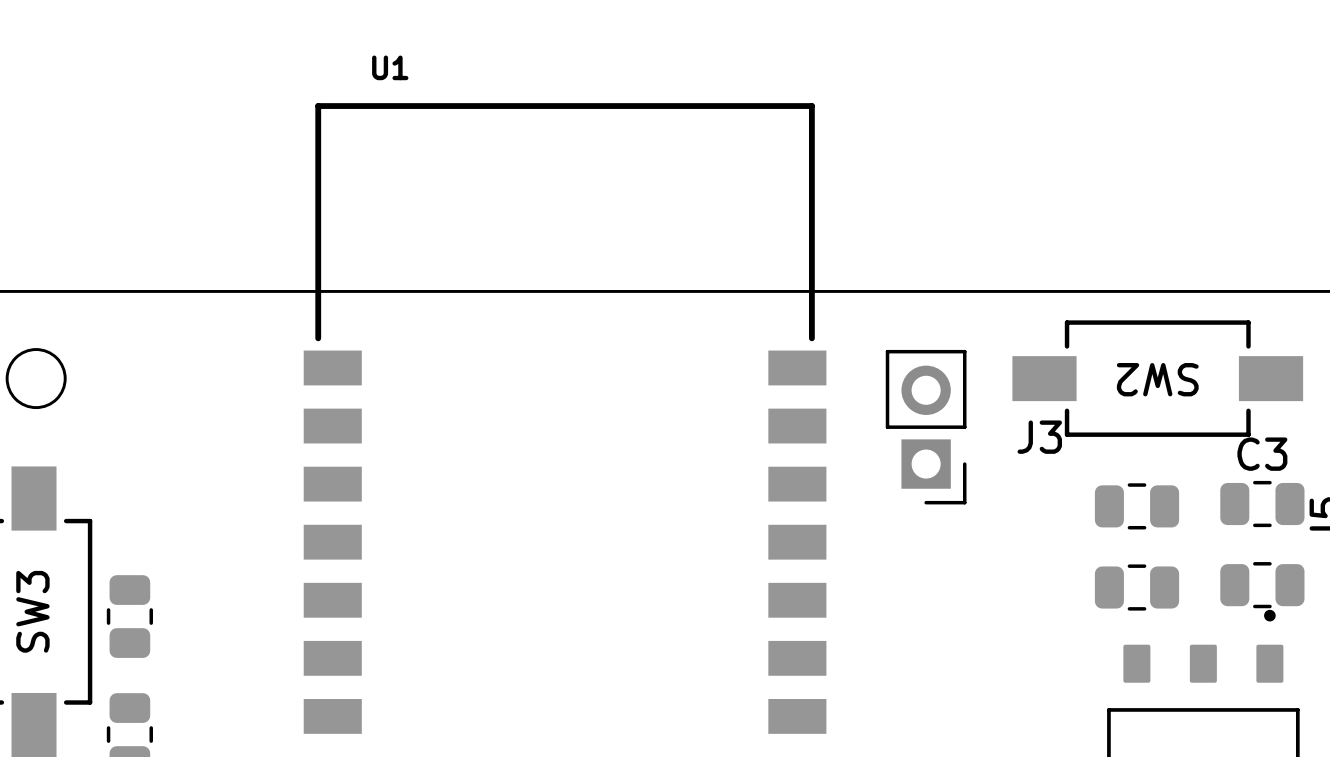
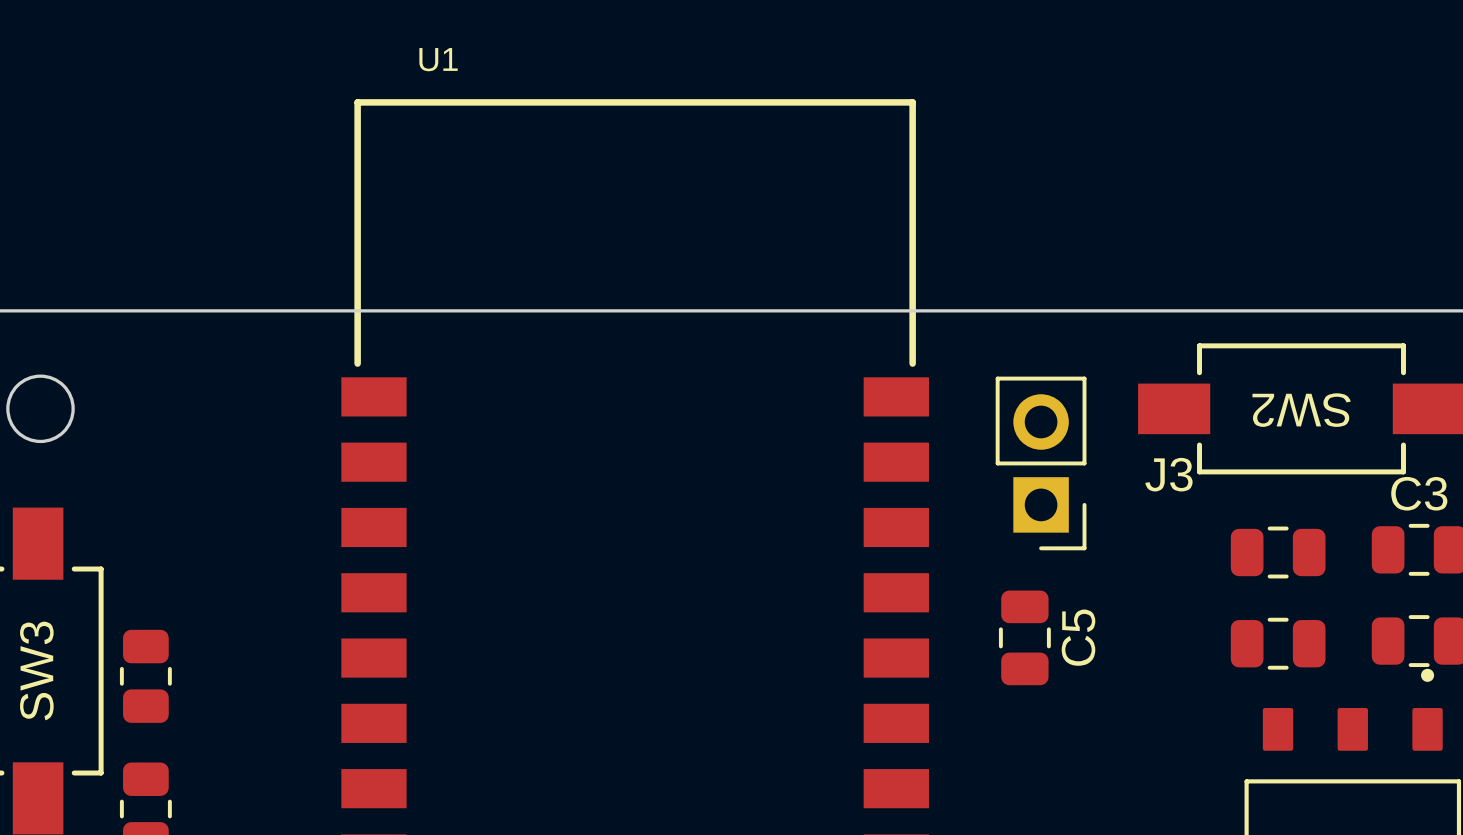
C5: none -> (1024, 637)

